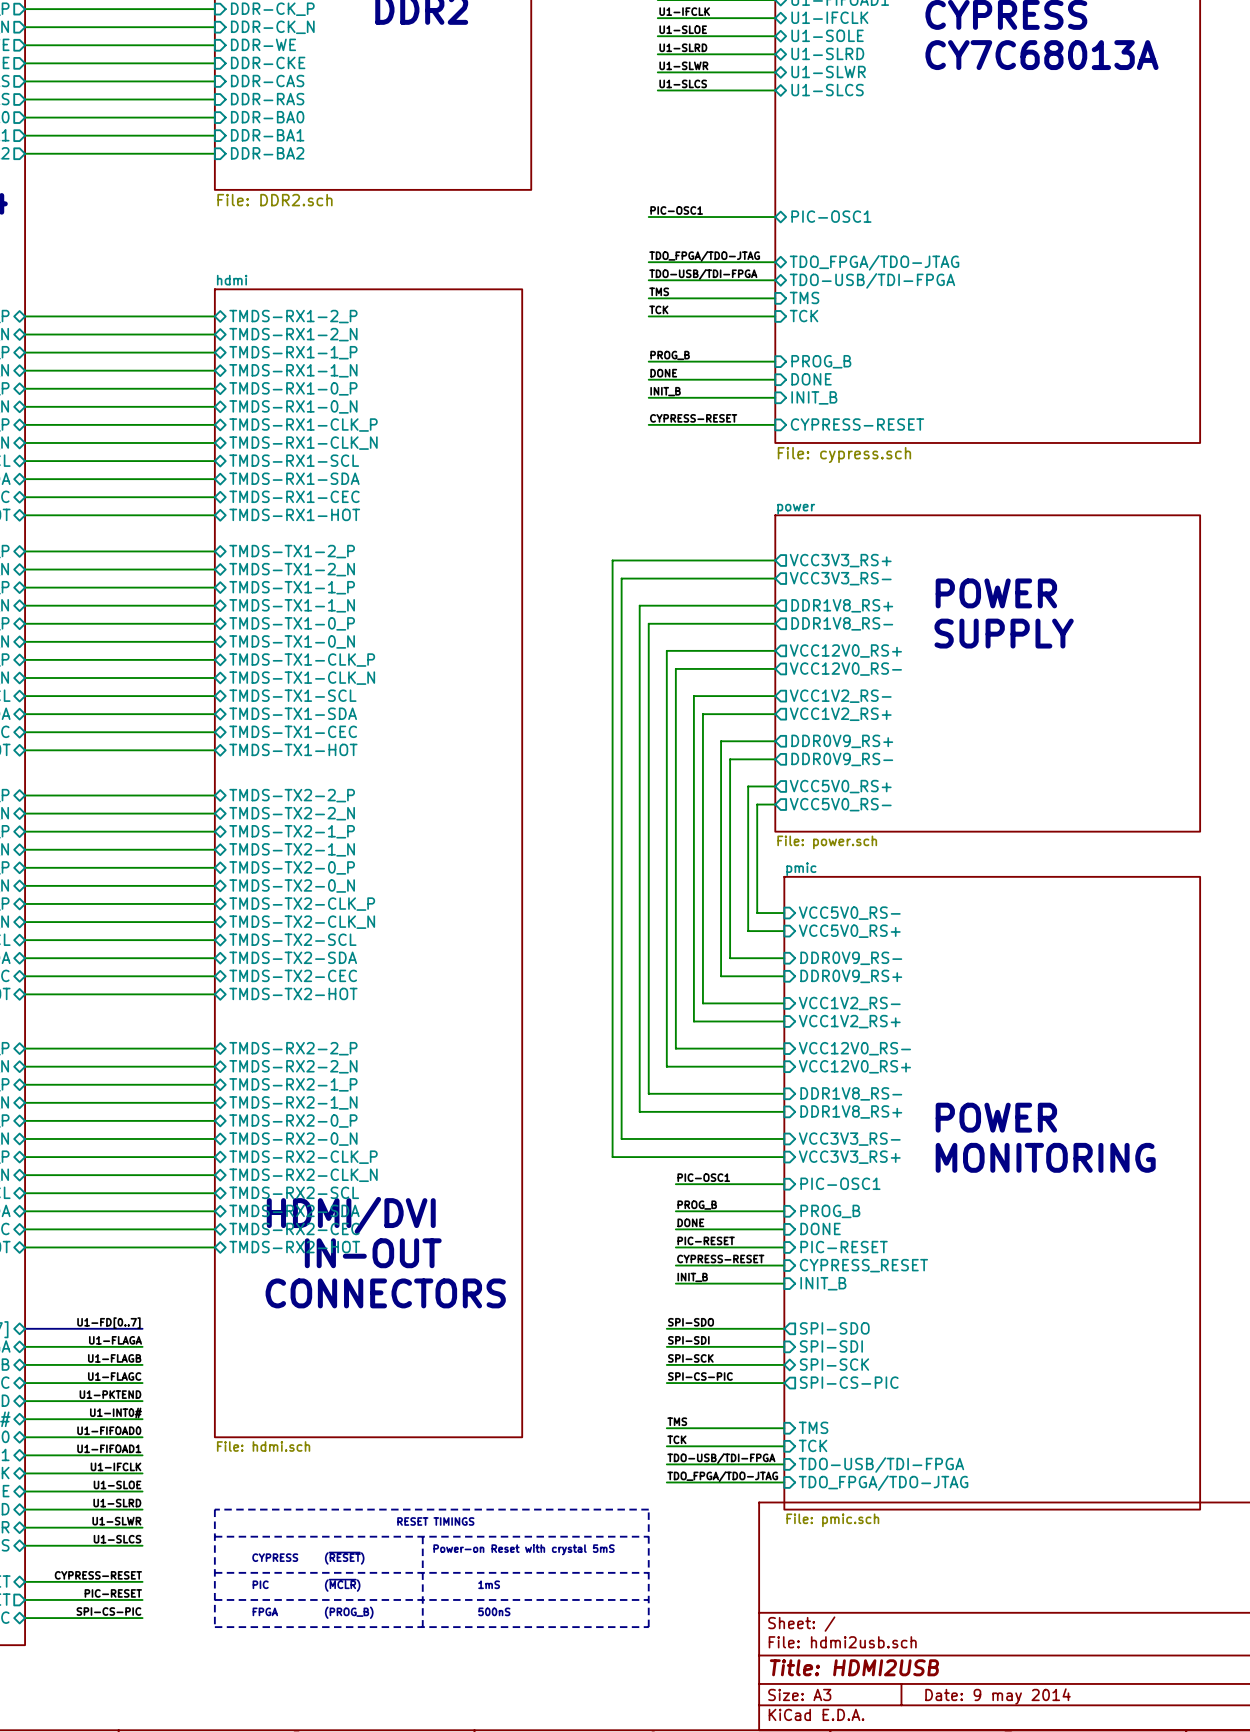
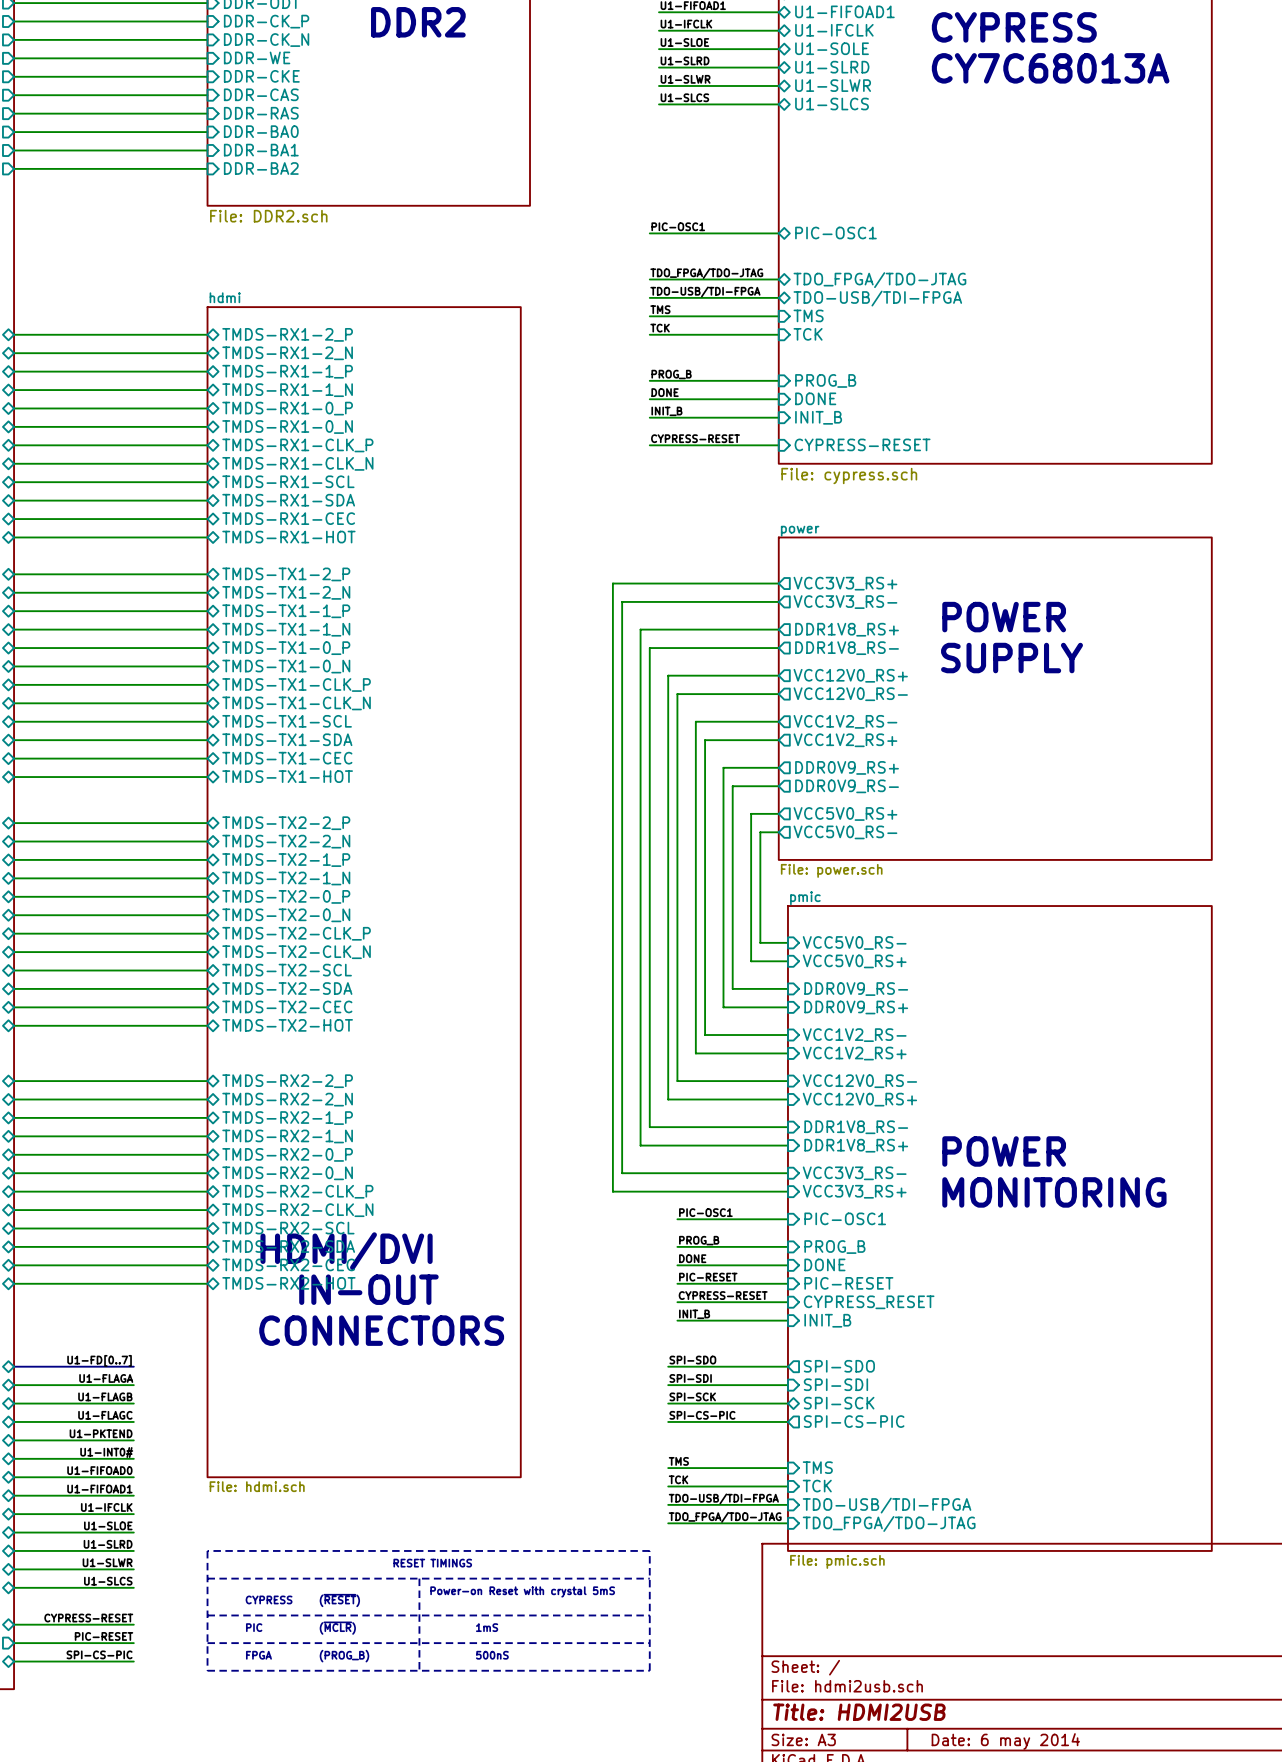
title block: Date: 9 may 2014 (998, 1696) -> Date: 6 may 2014 (1005, 1741)

